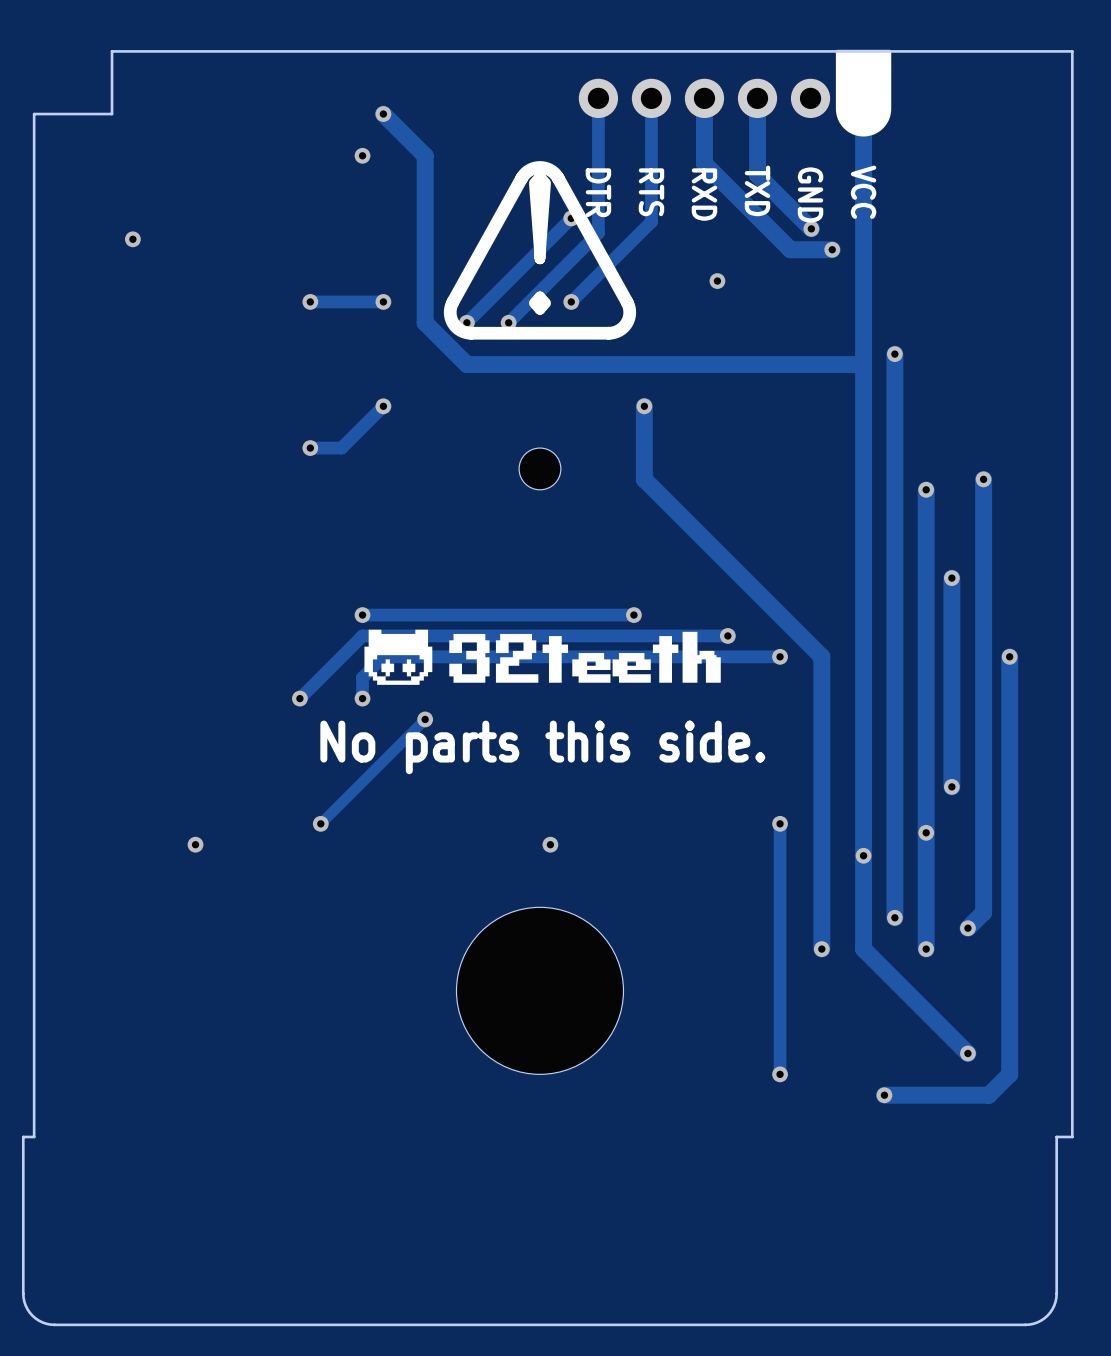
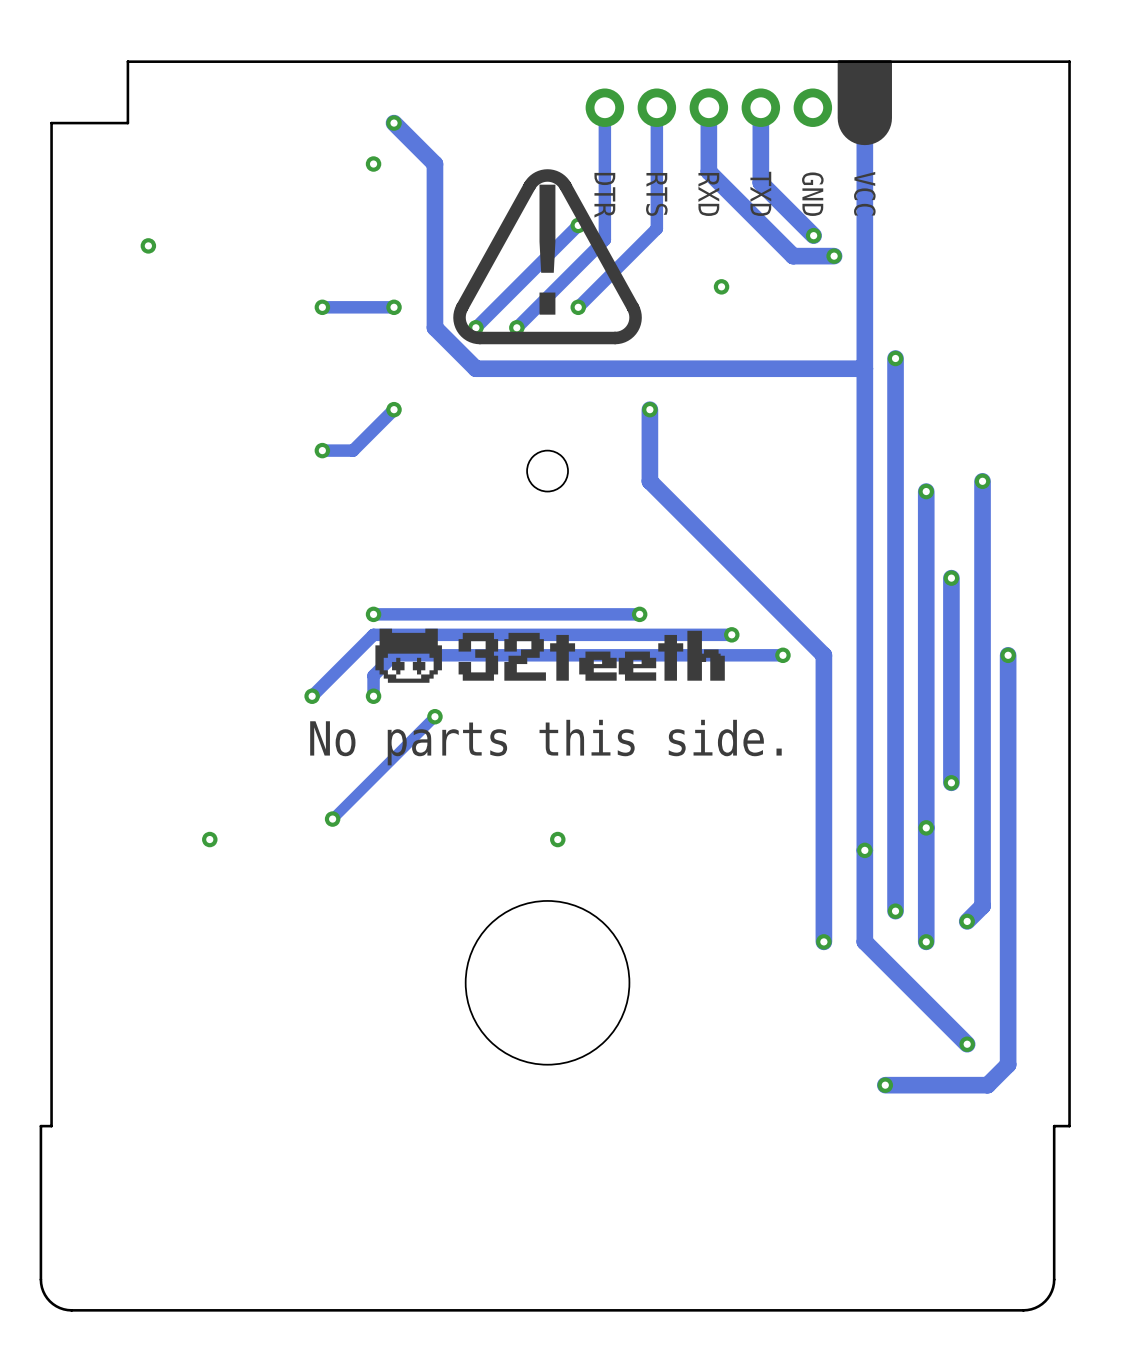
track: (780, 823) (780, 1074) -> none
via: (780, 823) -> none
via: (780, 1074) -> none

